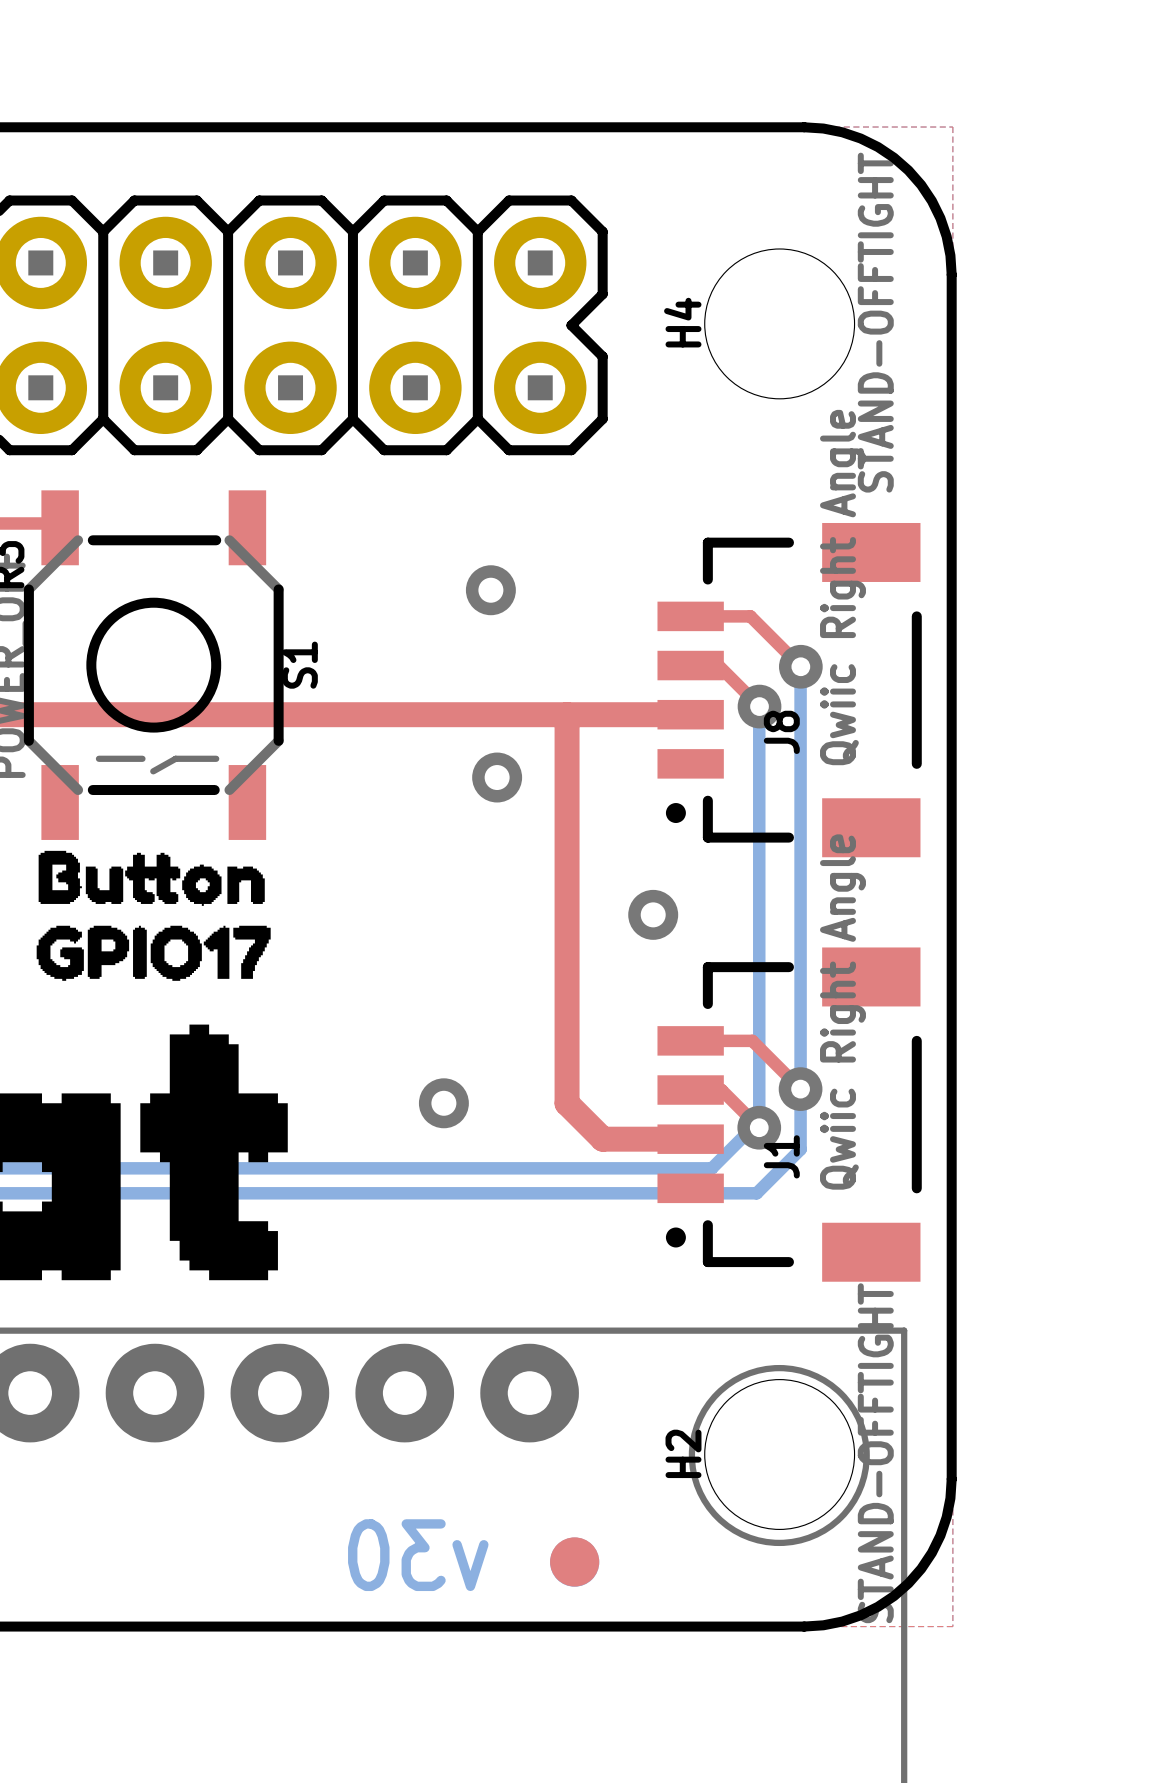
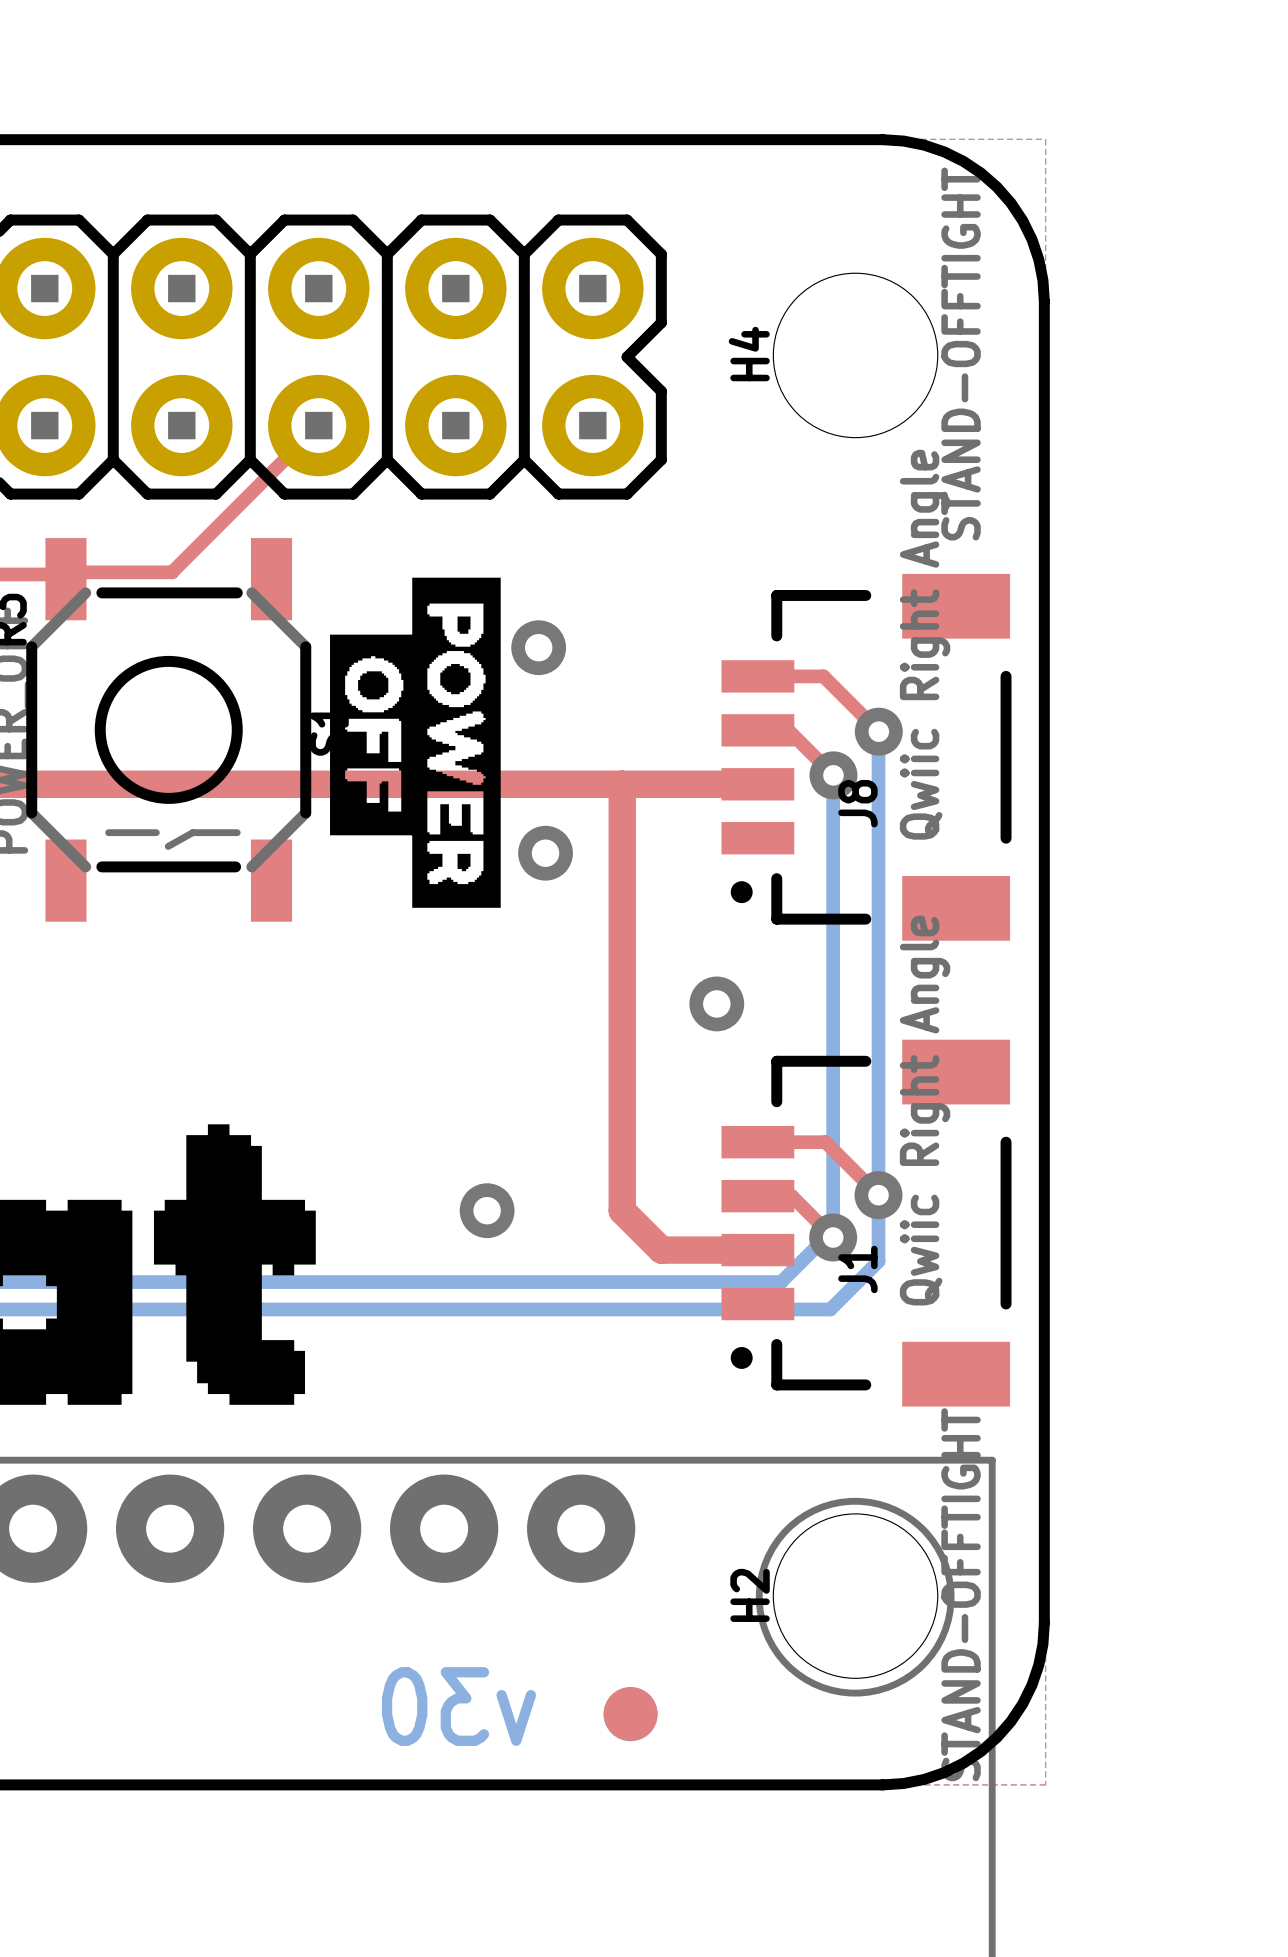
top track: none -> (318, 425) (172, 572) (72, 572) (65, 579)
drawing: none -> [330, 577, 501, 908]
drawing: [36, 850, 271, 981] -> none

